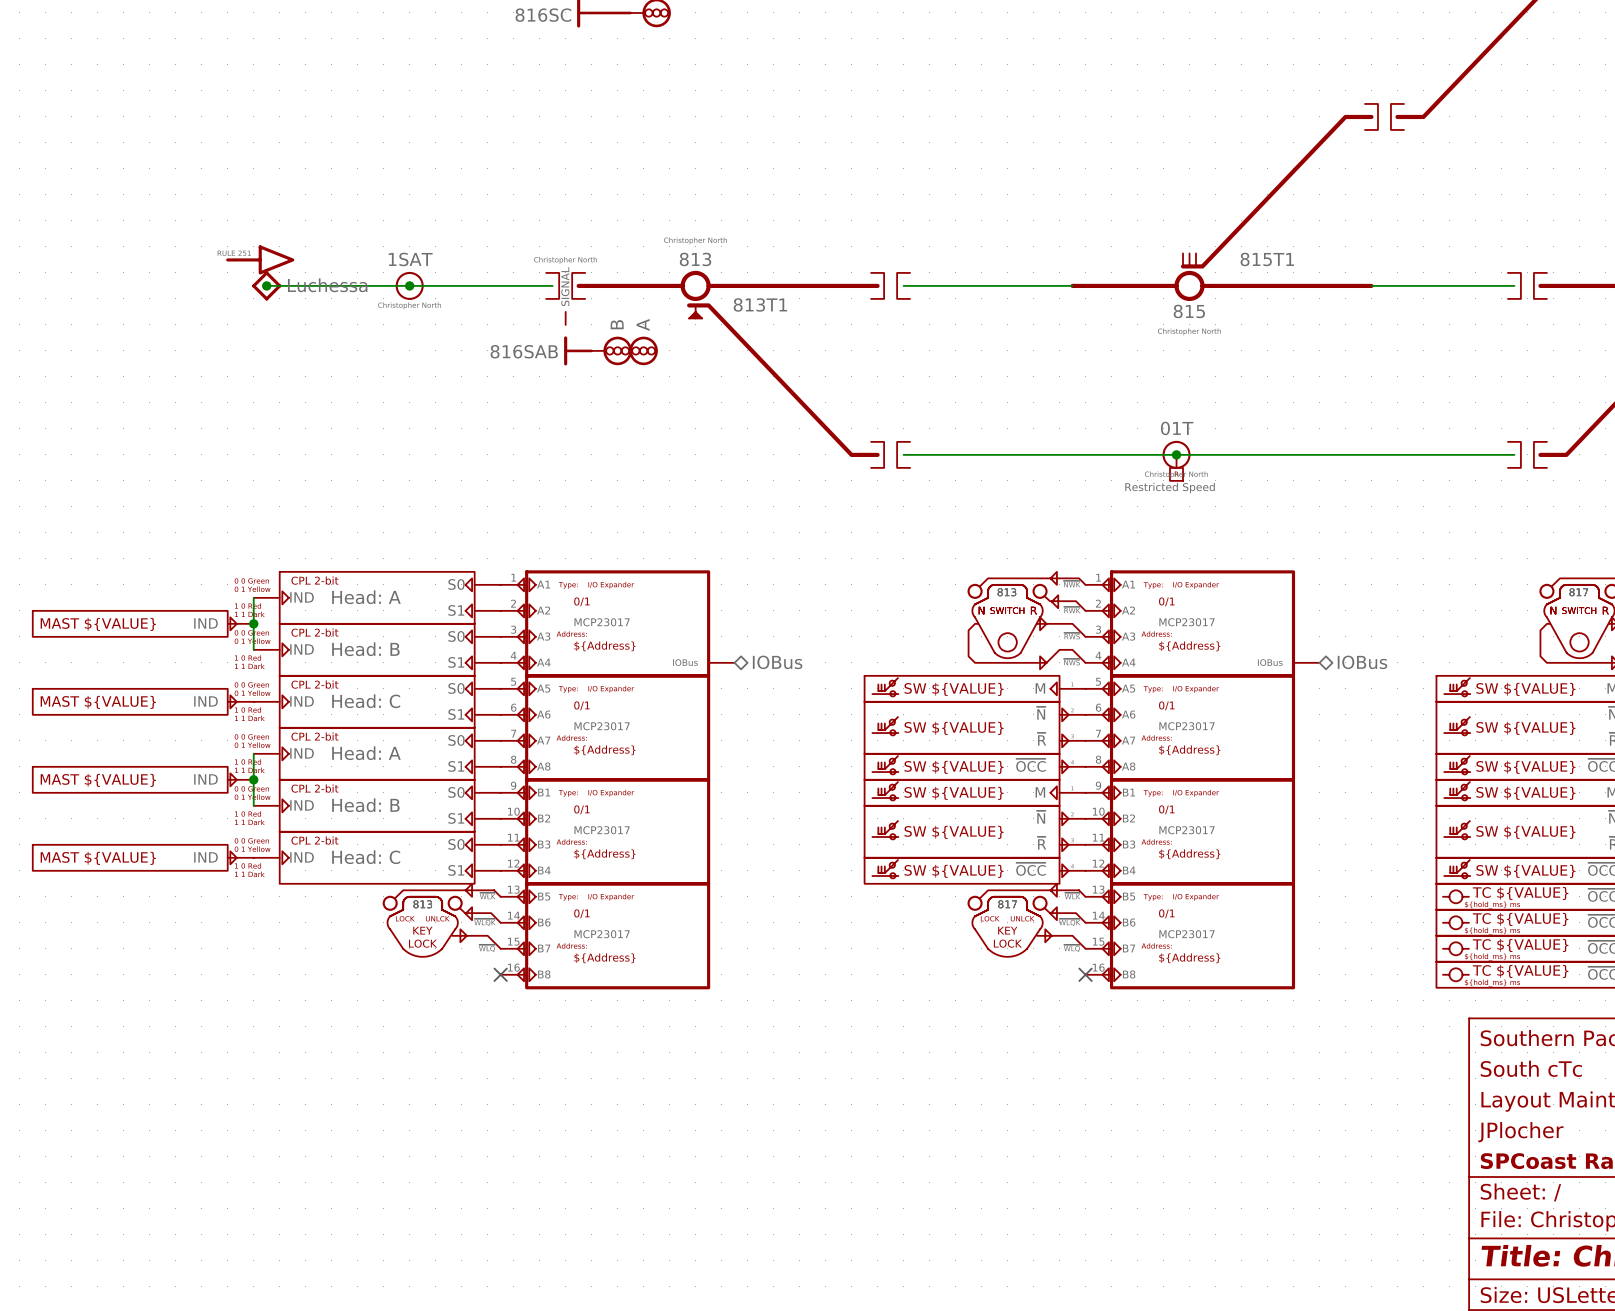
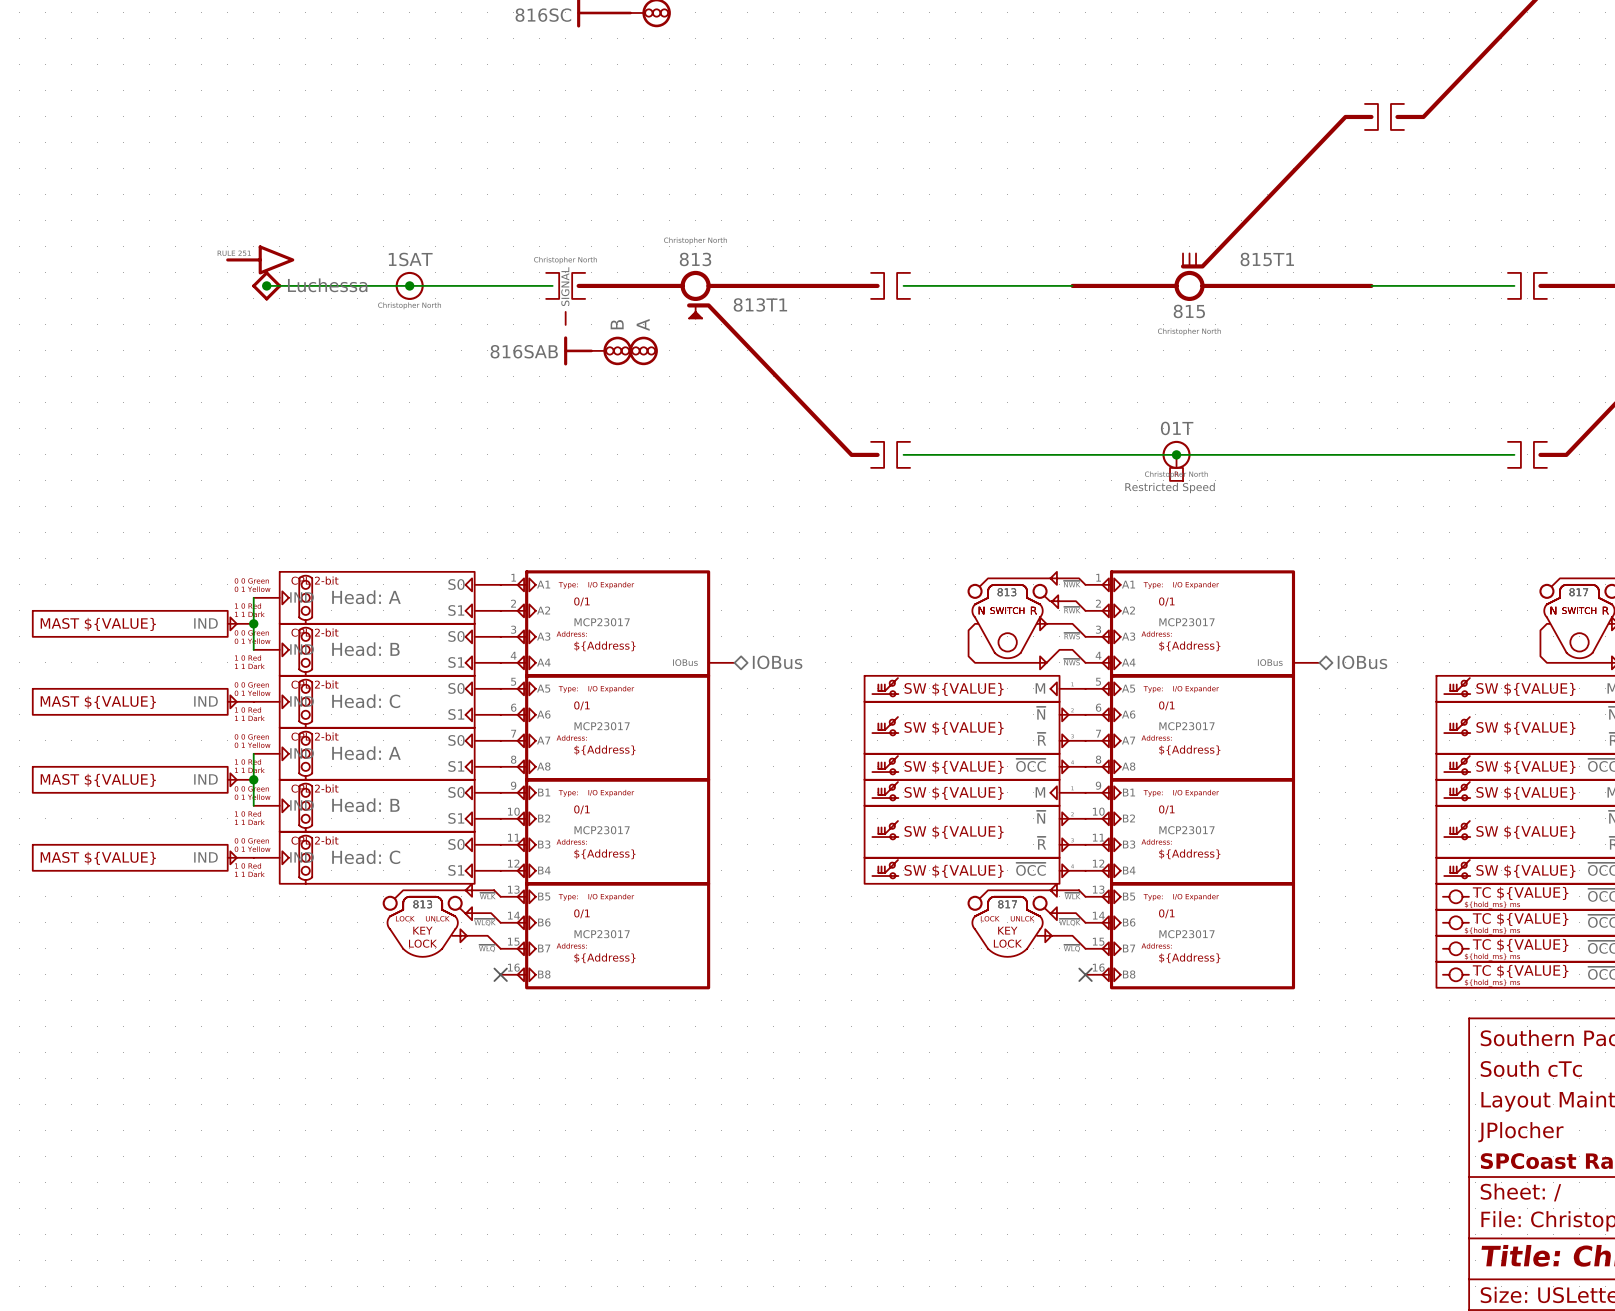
part symbol: [253, 571, 501, 624] -> [253, 571, 501, 624]
part symbol: [253, 623, 501, 676] -> [253, 623, 501, 676]
part symbol: [253, 675, 501, 728] -> [253, 675, 501, 728]
part symbol: [253, 727, 501, 780] -> [253, 727, 501, 780]
part symbol: [253, 779, 501, 832] -> [253, 779, 501, 832]
part symbol: [253, 831, 501, 884] -> [253, 831, 501, 884]

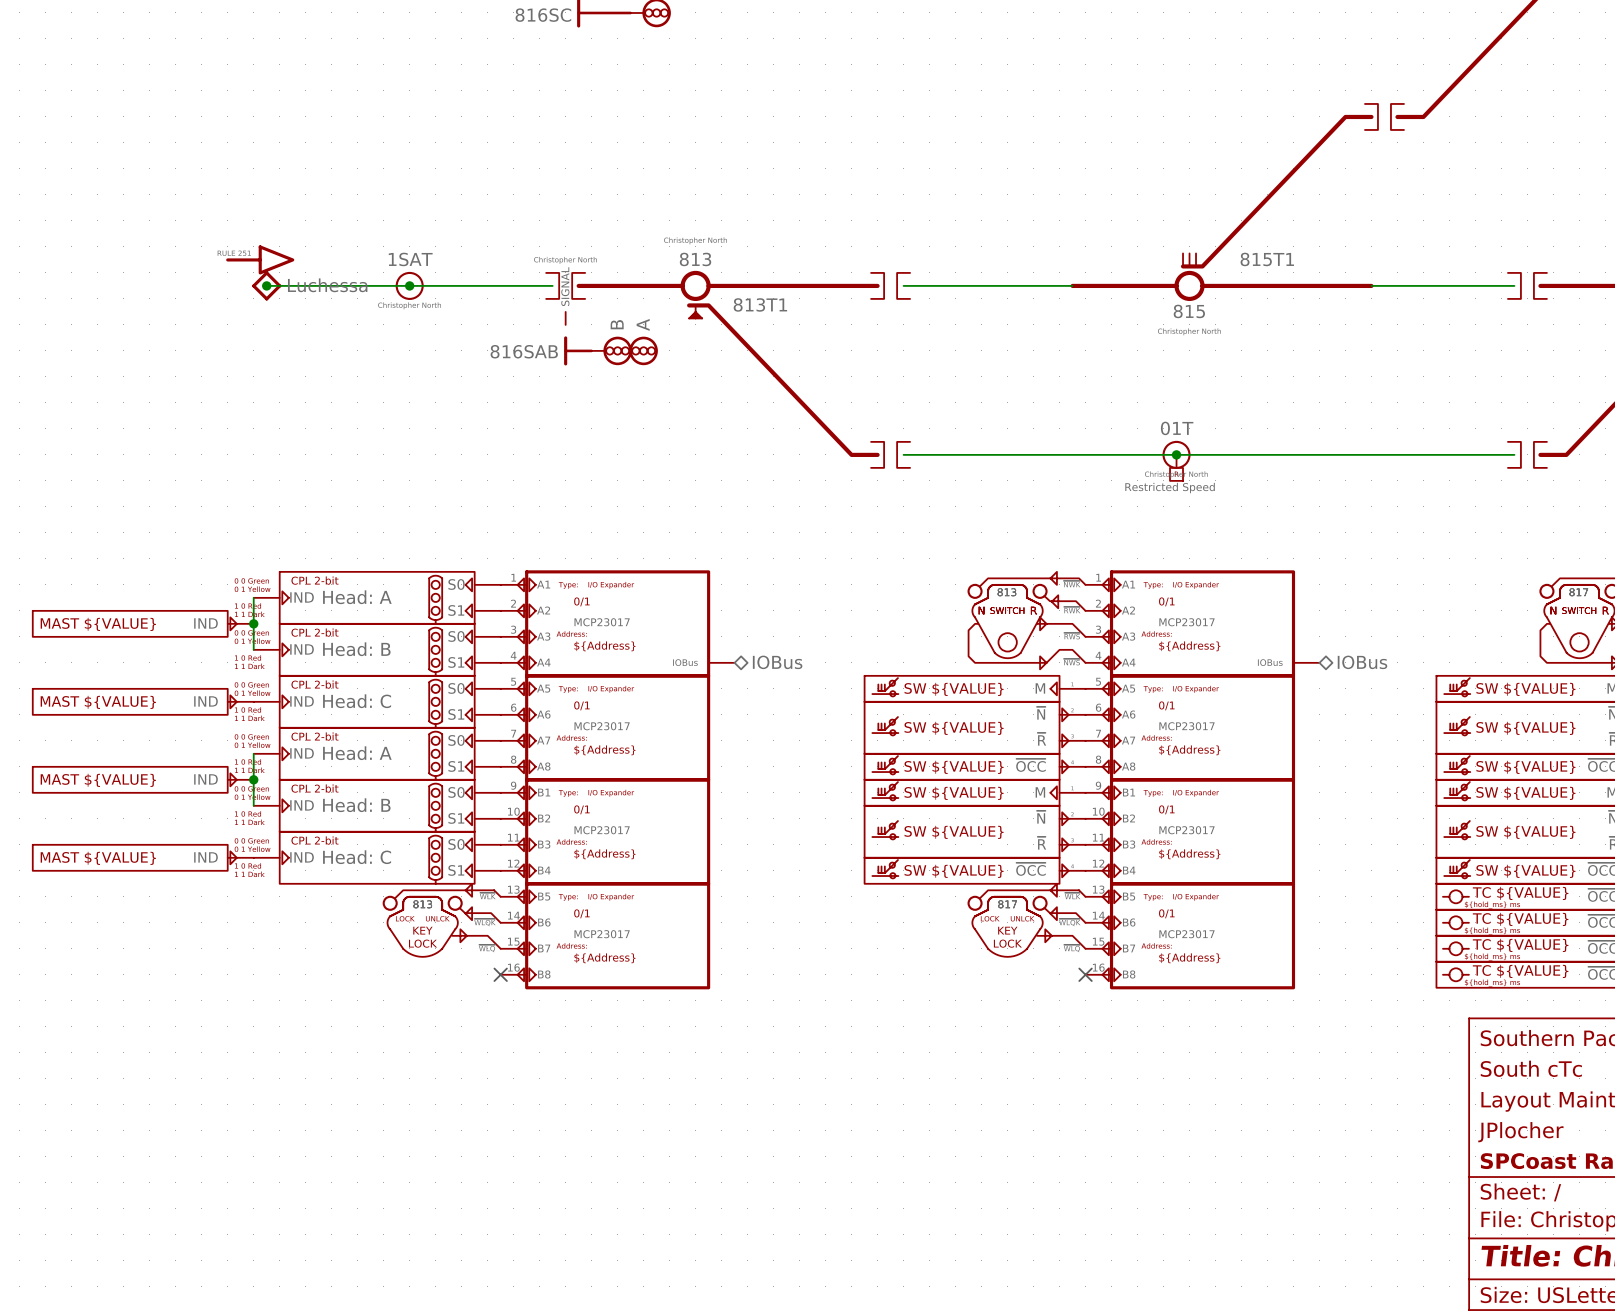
part symbol: [253, 571, 501, 624] -> [253, 571, 501, 624]
part symbol: [253, 623, 501, 676] -> [253, 623, 501, 676]
part symbol: [253, 675, 501, 728] -> [253, 675, 501, 728]
part symbol: [253, 727, 501, 780] -> [253, 727, 501, 780]
part symbol: [253, 779, 501, 832] -> [253, 779, 501, 832]
part symbol: [253, 831, 501, 884] -> [253, 831, 501, 884]

